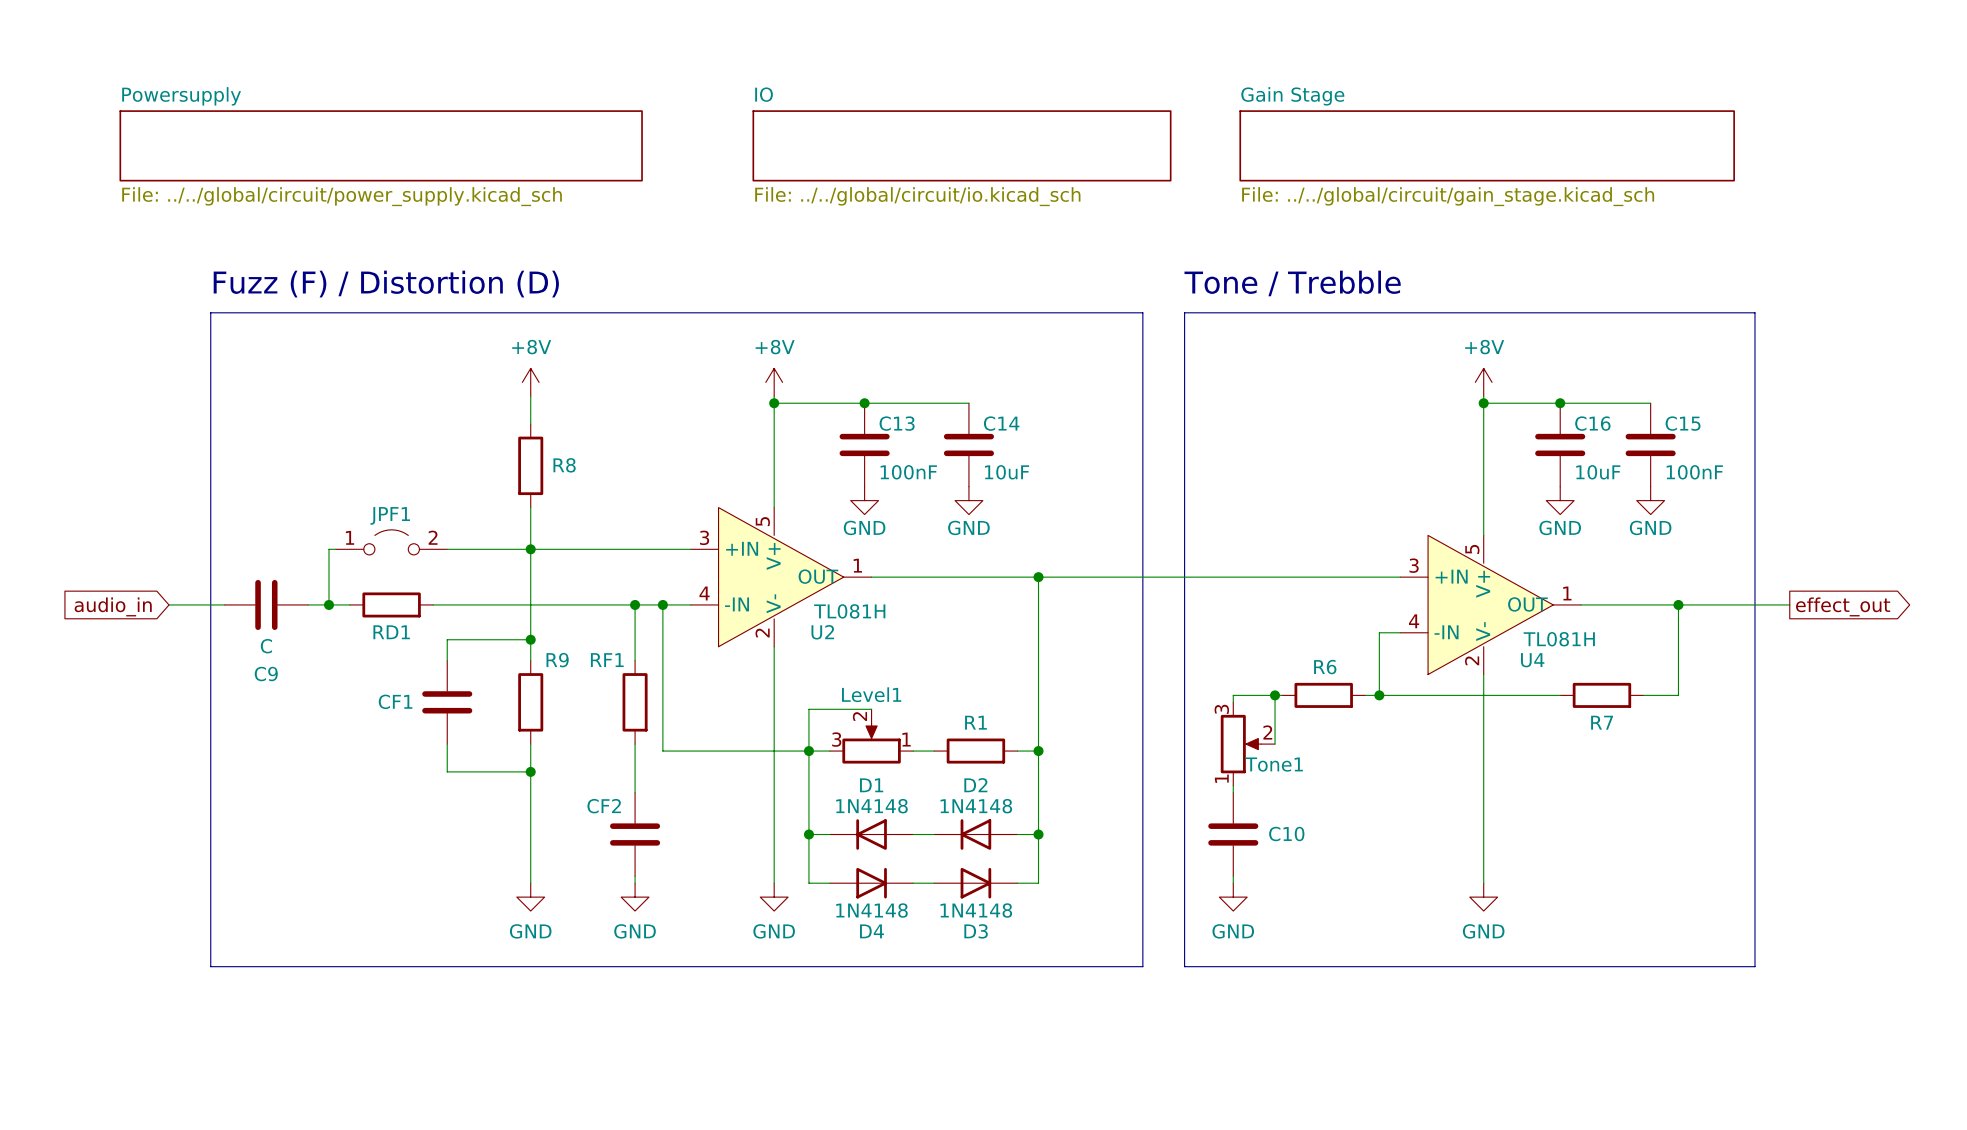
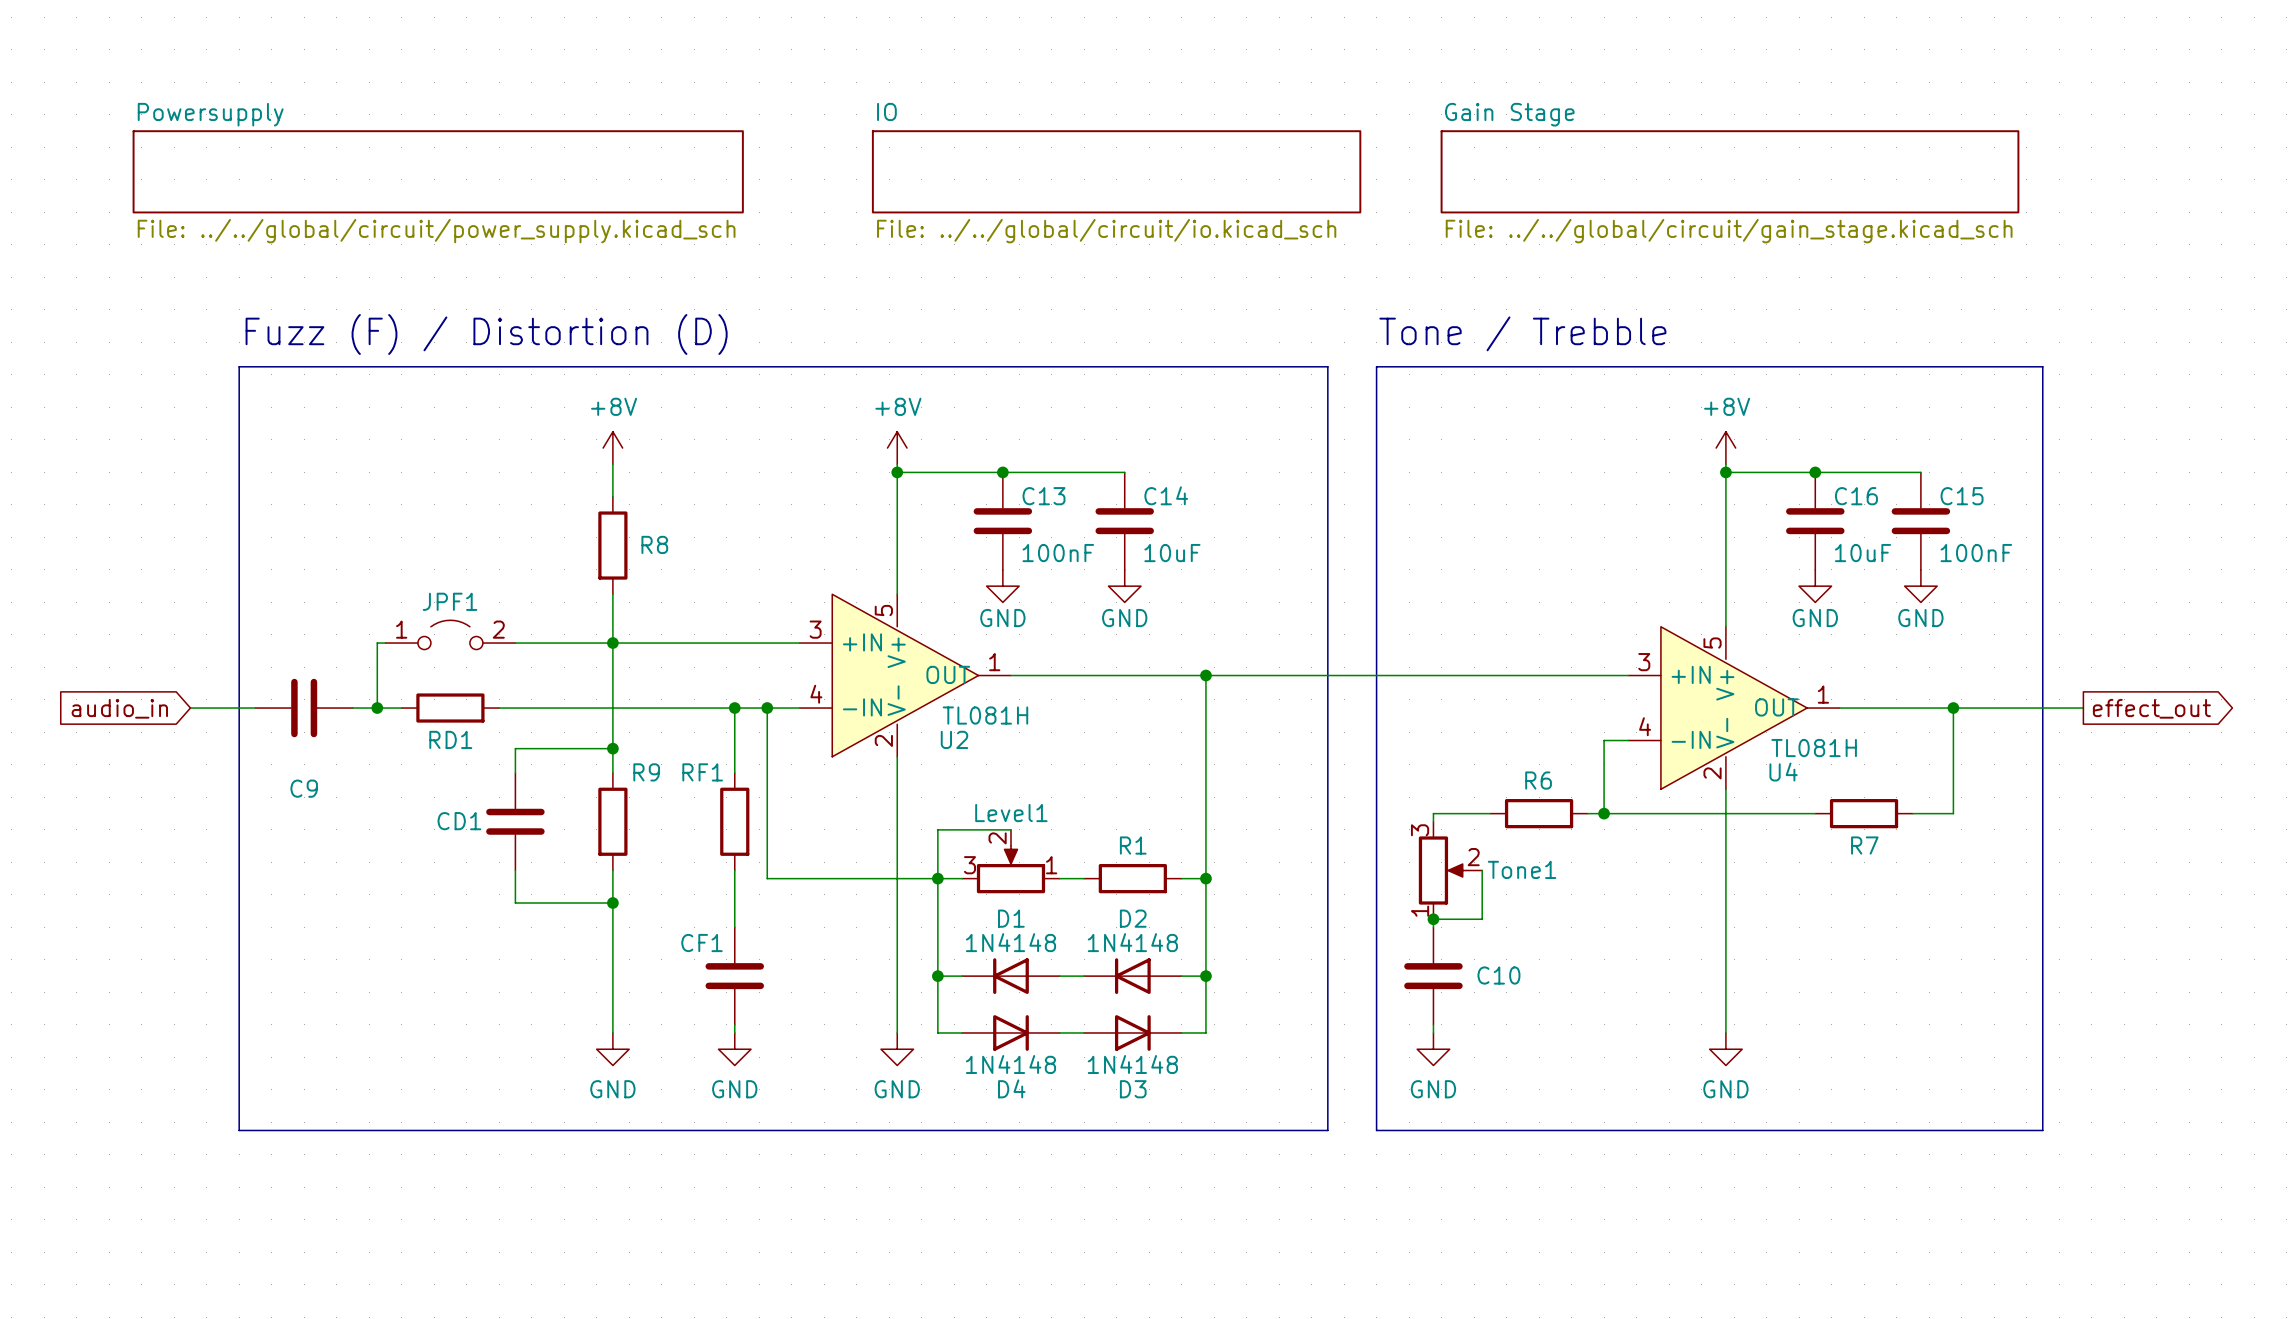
C9 value: C (266, 646) -> none
wire: (1275, 695) (1275, 744) -> (1433, 919) (1482, 919) (1482, 870)
junction: (1275, 695) -> none
CF1 name: CF1 (395, 701) -> CD1 (459, 821)
Tone1 name position: Tone1 (1274, 764) -> Tone1 (1522, 869)
junction: none -> (1433, 919)
CF2 name: CF2 (604, 806) -> CF1 (702, 943)

